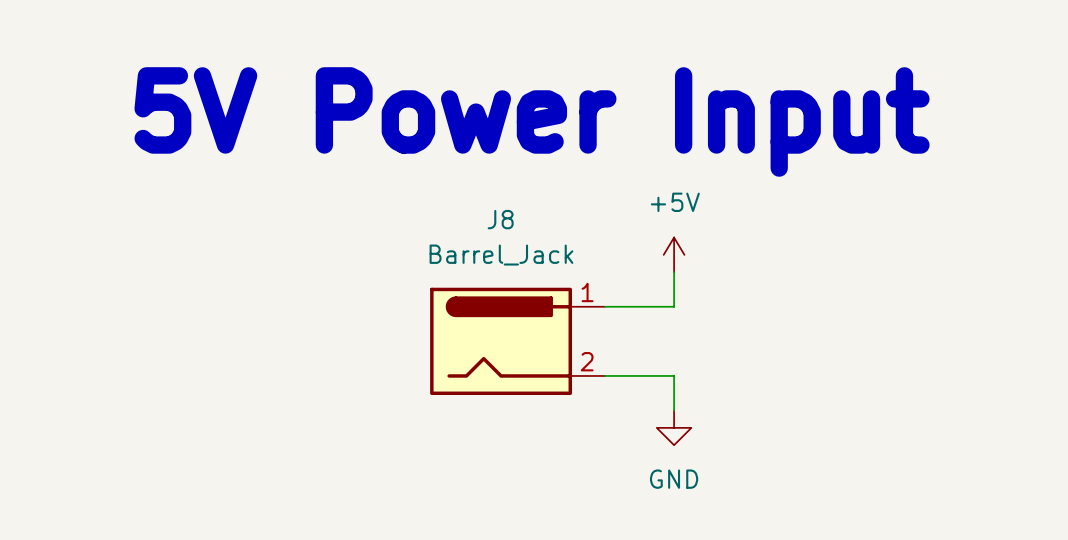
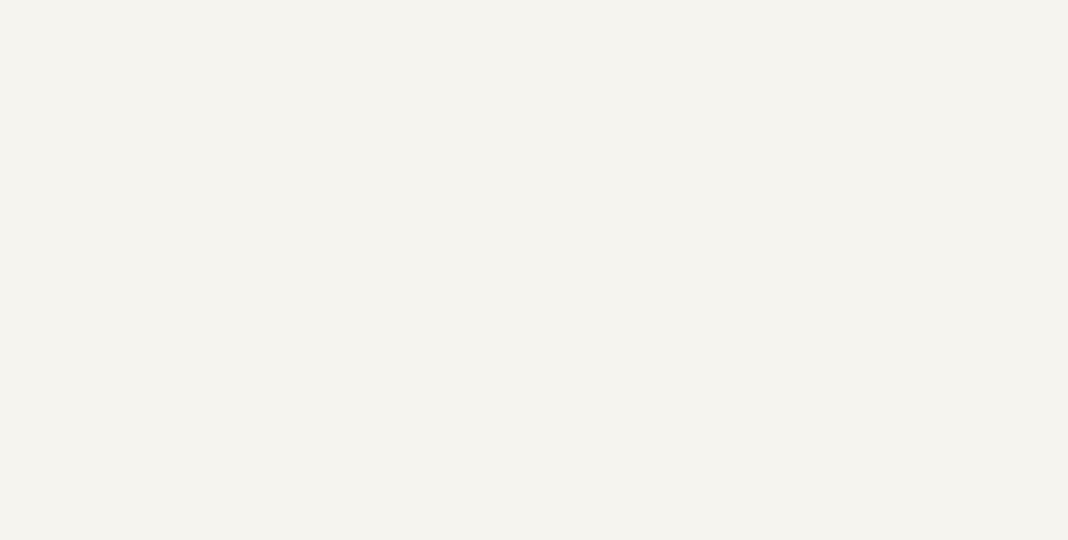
text: 5V Power Input (532, 121) -> none
power symbol: +5V (674, 254) -> none
wire: (674, 272) (674, 306) (604, 306) -> none
J8: Barrel_Jack (517, 341) -> none
wire: (604, 375) (674, 375) (674, 410) -> none
power symbol: GND (674, 427) -> none

